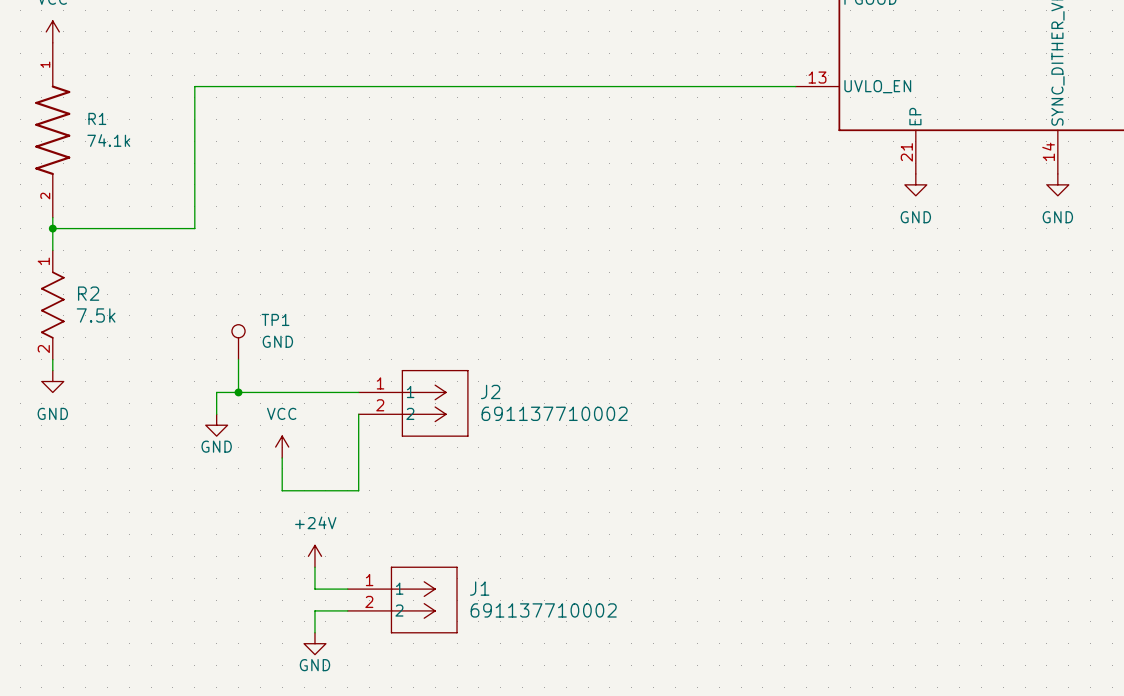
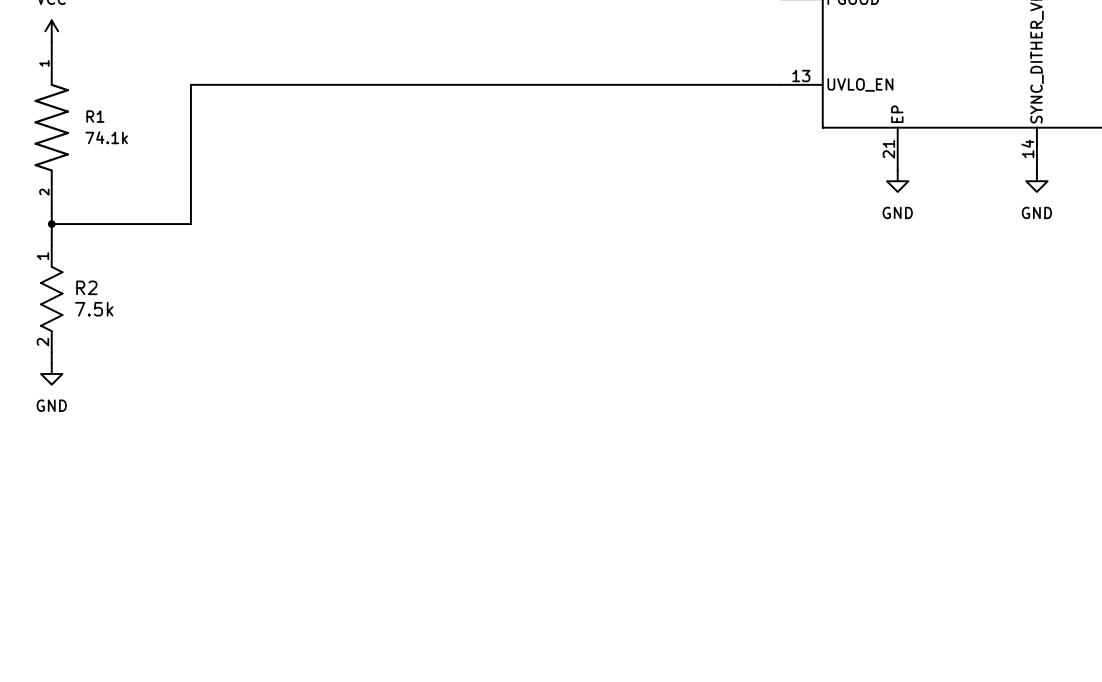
TP1: GND (238, 342) -> none
wire: (238, 359) (238, 392) -> none
junction: (238, 392) -> none
wire: (358, 392) (216, 392) (216, 414) -> none
J2: 691137710002 (413, 403) -> none
wire: (358, 414) (358, 490) (282, 490) (282, 457) -> none
power symbol: GND (216, 425) -> none
power symbol: VCC (282, 447) -> none
power symbol: +24V (314, 556) -> none
wire: (314, 567) (314, 589) (347, 589) -> none
J1: 691137710002 (402, 600) -> none
wire: (347, 610) (314, 610) (314, 632) -> none
power symbol: GND (314, 643) -> none

